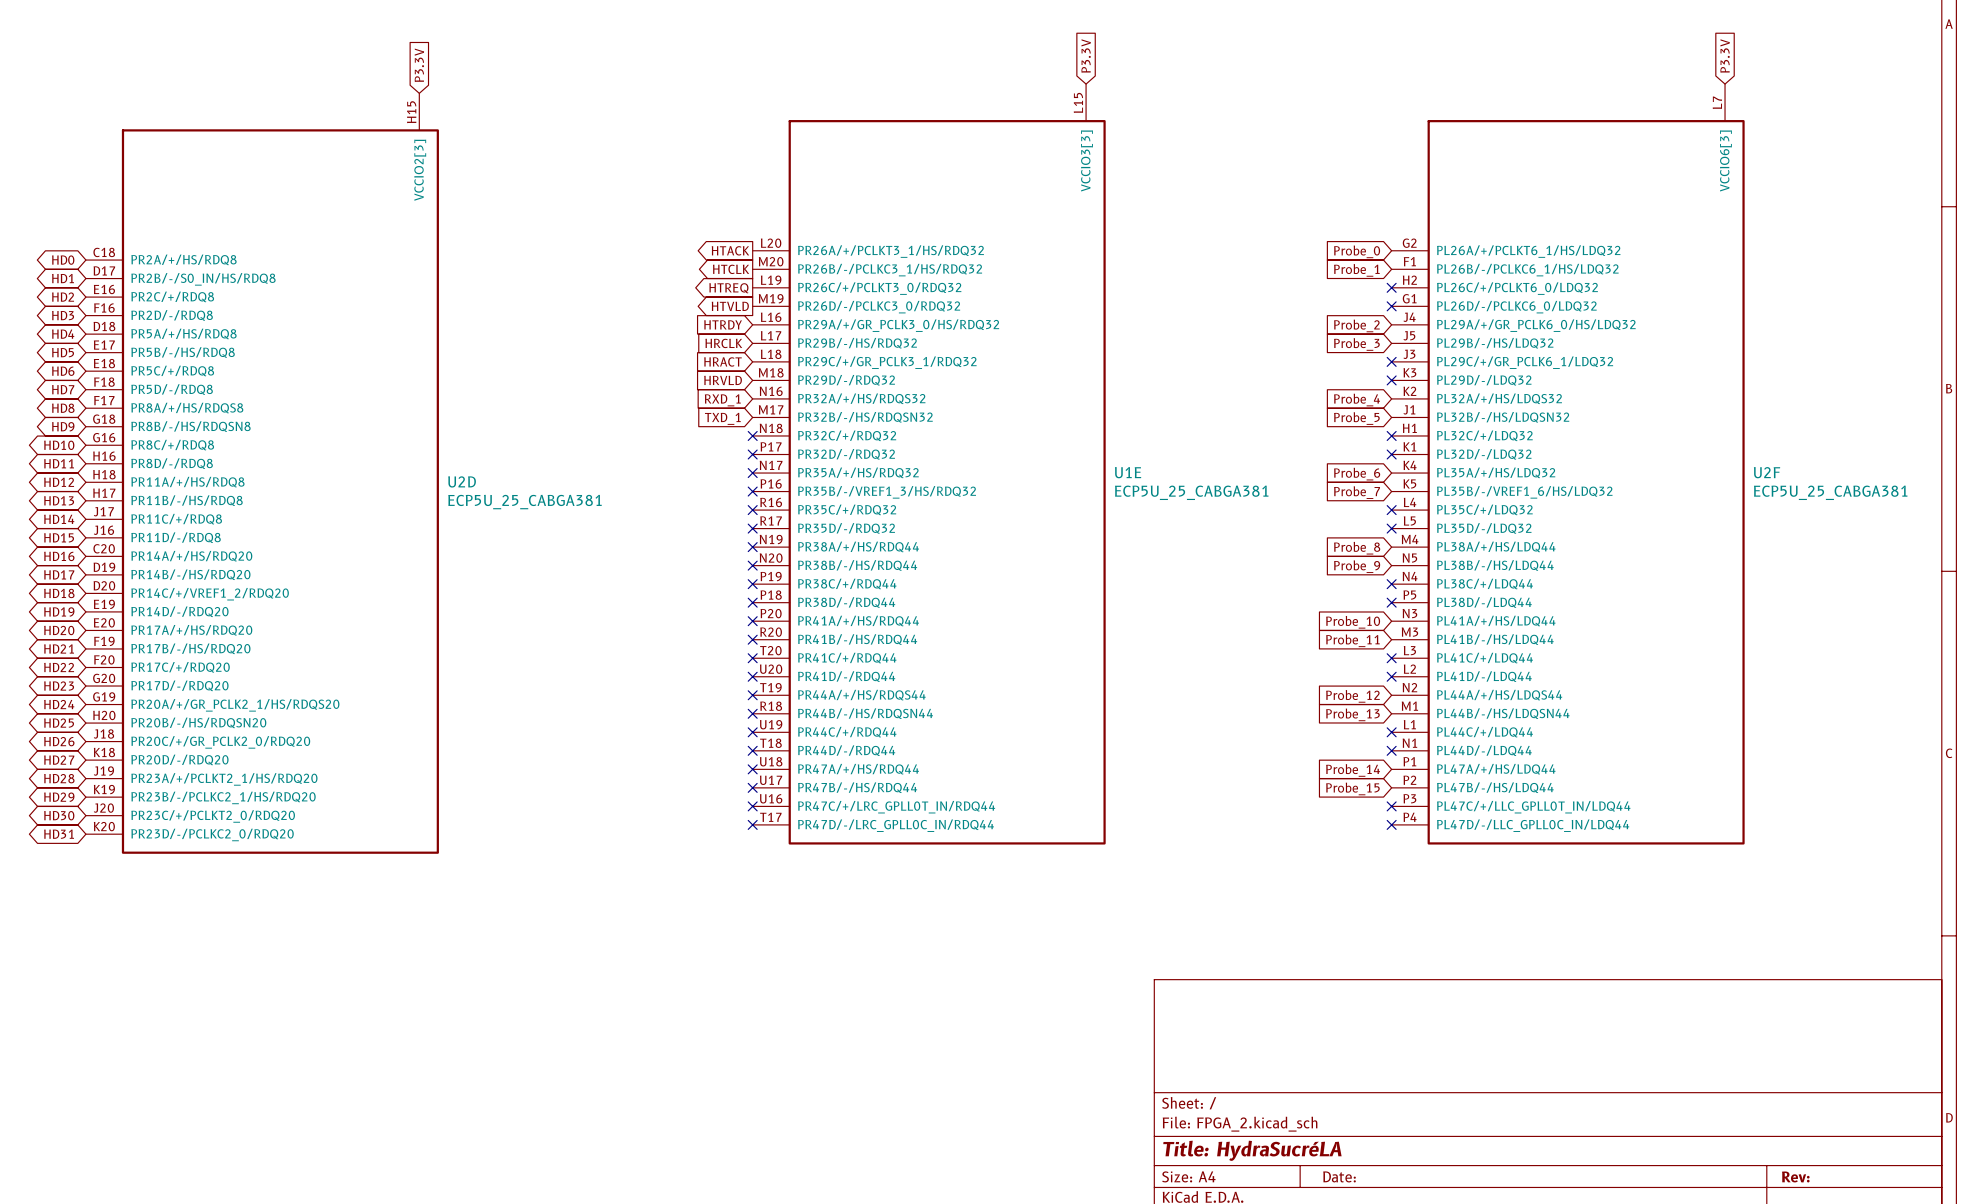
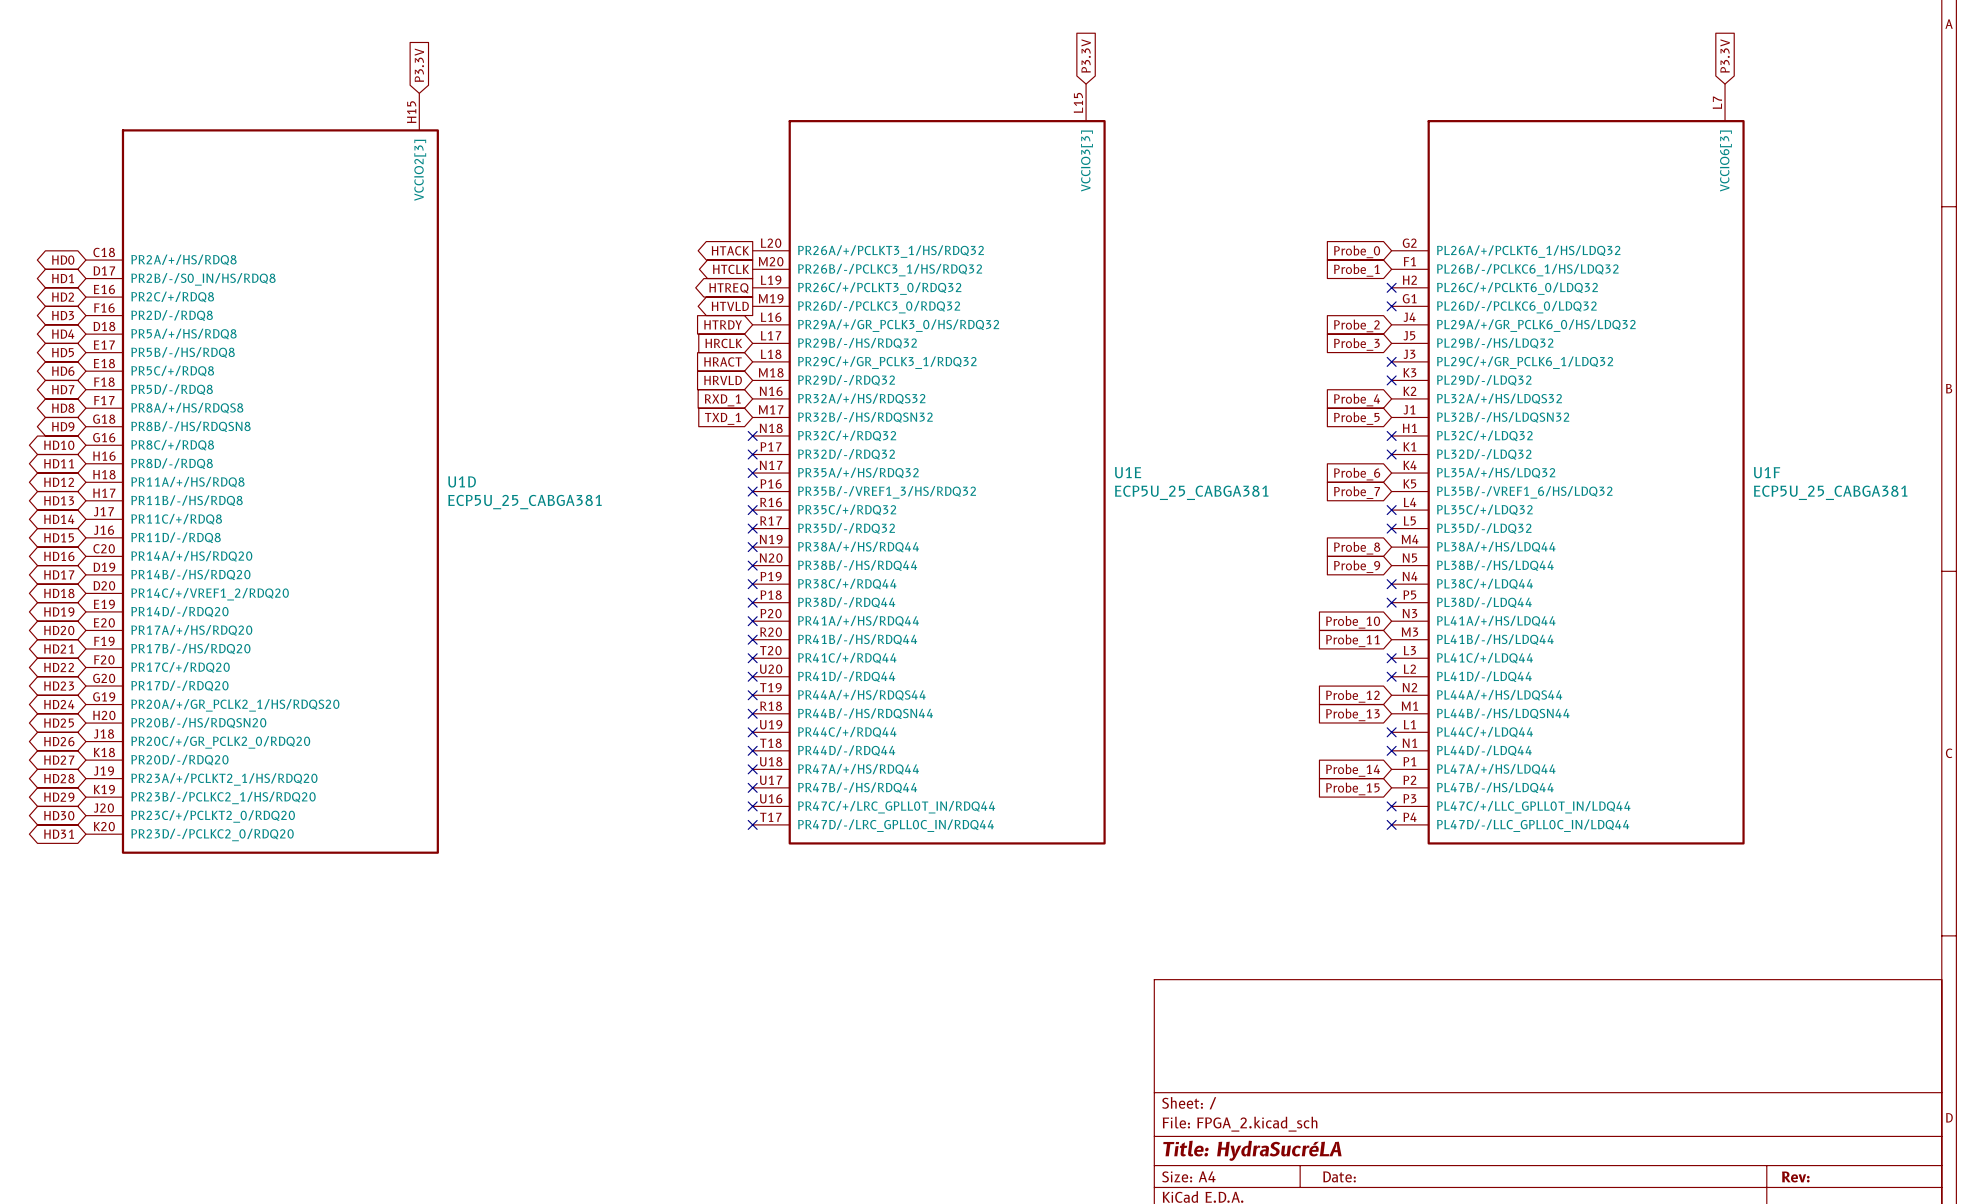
U2F name: U2F (1767, 472) -> U1F (1767, 472)
U2D name: U2D (462, 481) -> U1D (462, 481)

